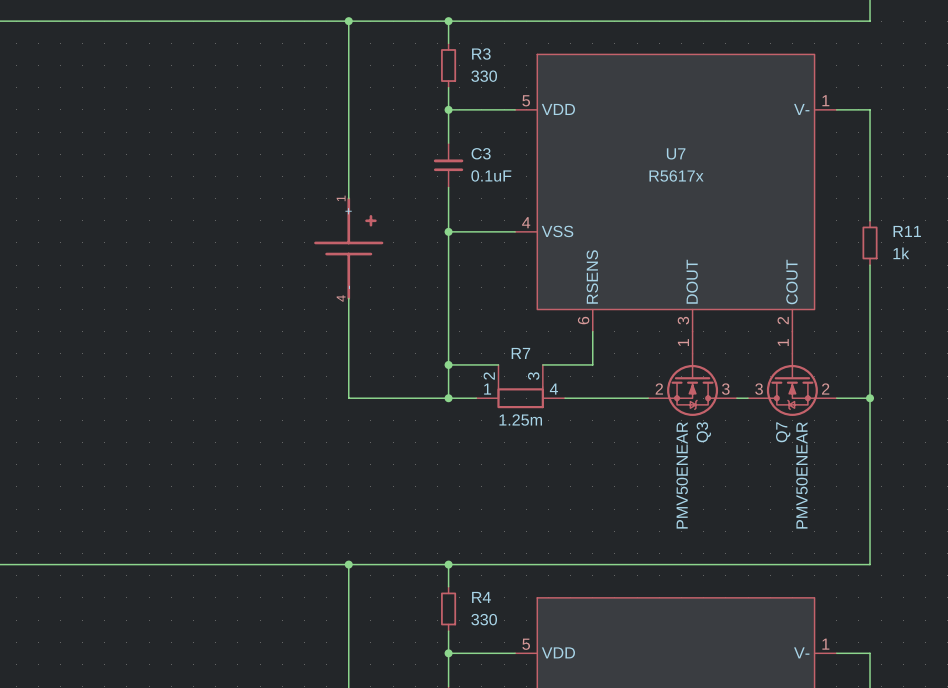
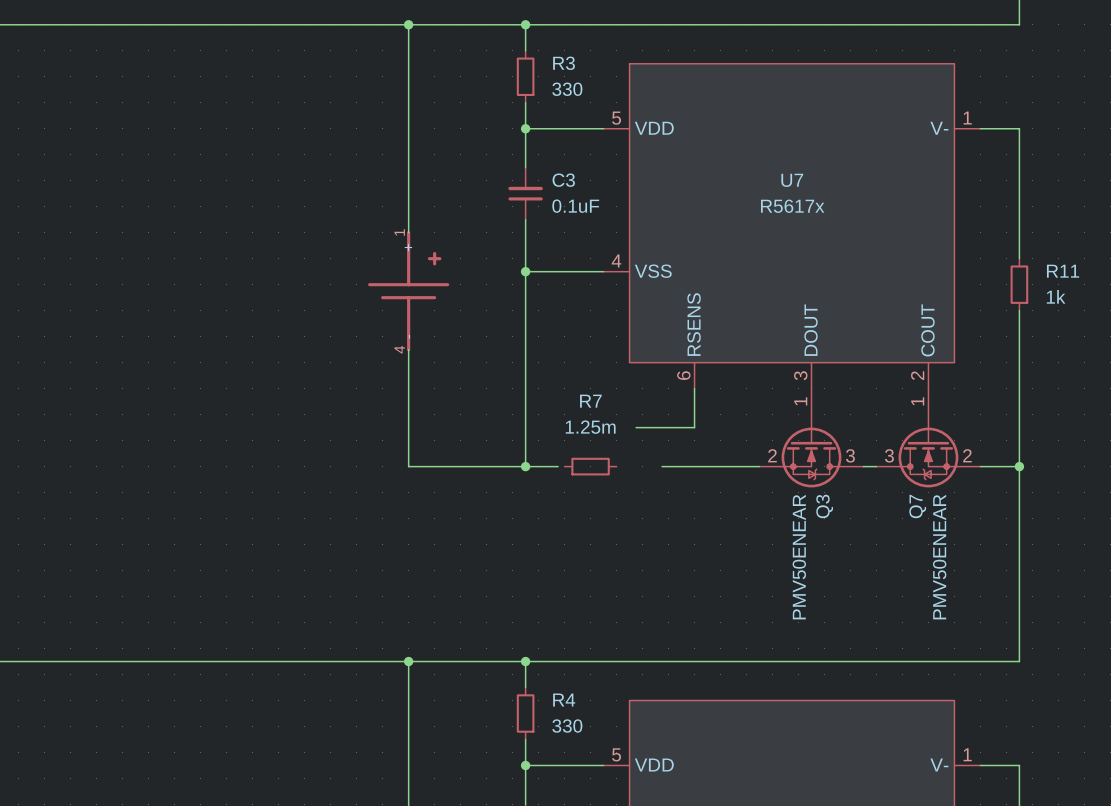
R7 name position: R7 (520, 353) -> R7 (590, 401)
wire: (448, 364) (498, 364) -> none
junction: (448, 364) -> none
R7 symbol: [476, 364, 566, 409] -> [564, 457, 617, 476]
R7 value position: 1.25m (520, 419) -> 1.25m (590, 427)

